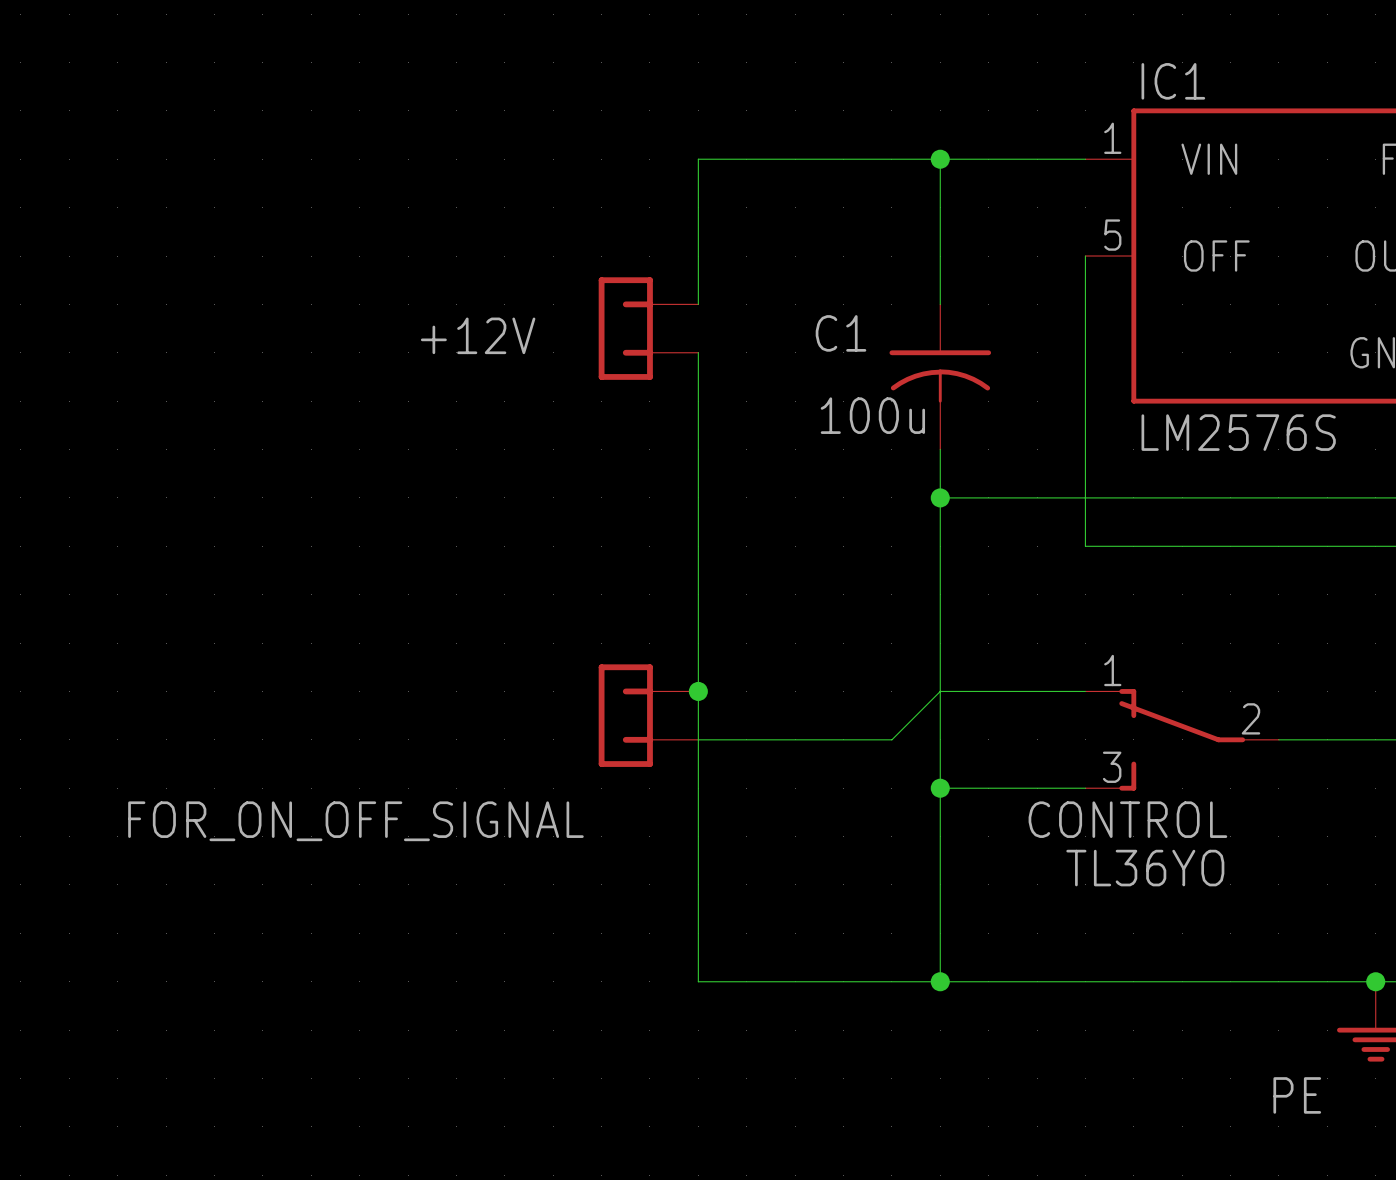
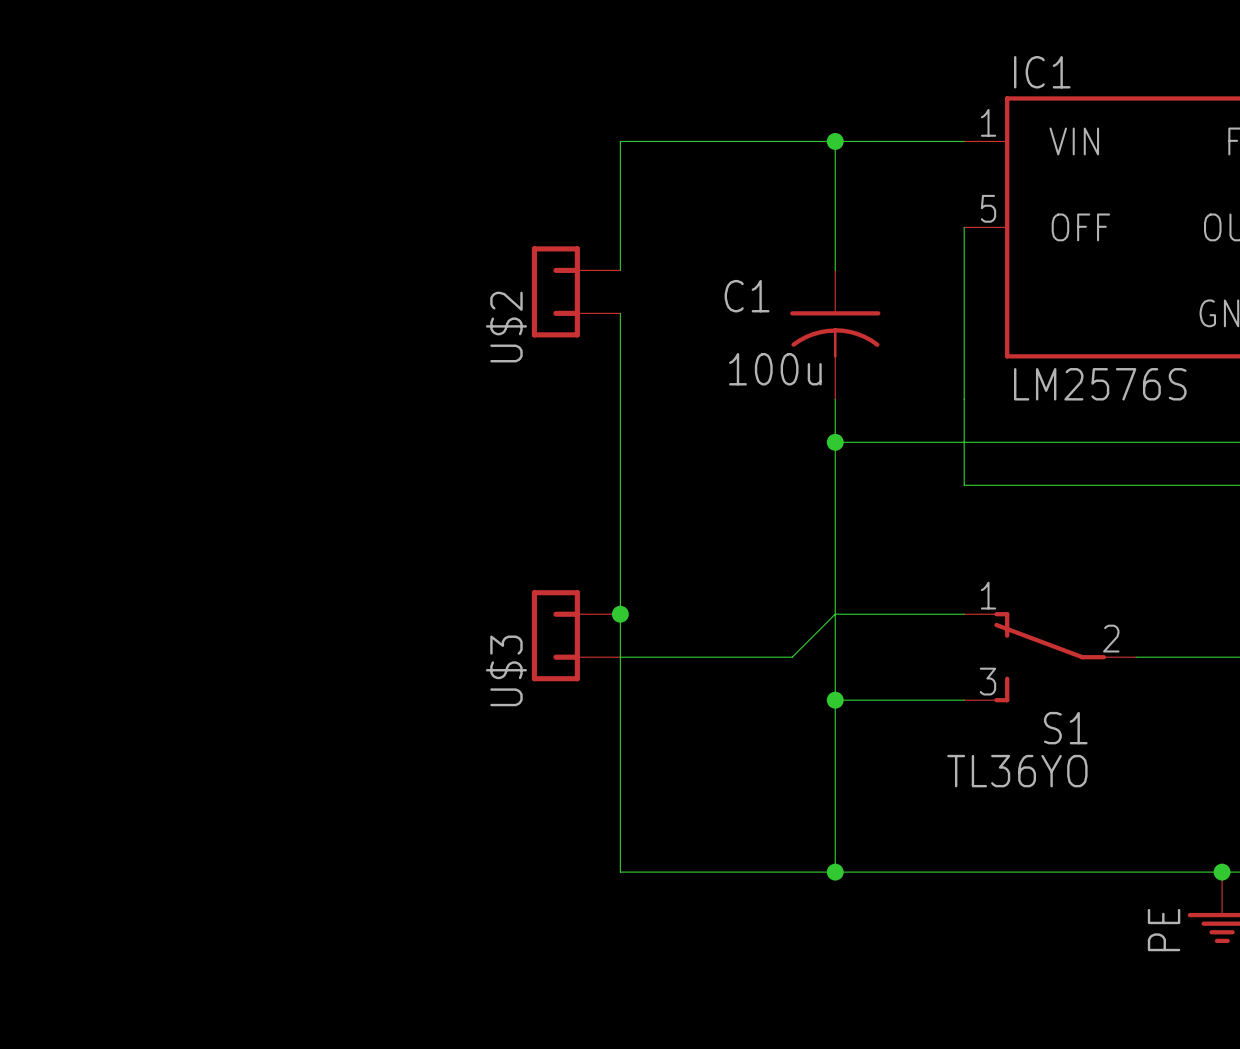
+12V name: +12V (478, 335) -> U$2 (506, 327)
CONTROL name: CONTROL (1127, 819) -> S1 (1065, 728)
FOR_ON_OFF_SIGNAL name: FOR_ON_OFF_SIGNAL (355, 821) -> U$3 (506, 670)
power symbol text rotation: 0° (1297, 1095) -> 90° counterclockwise (1164, 930)

